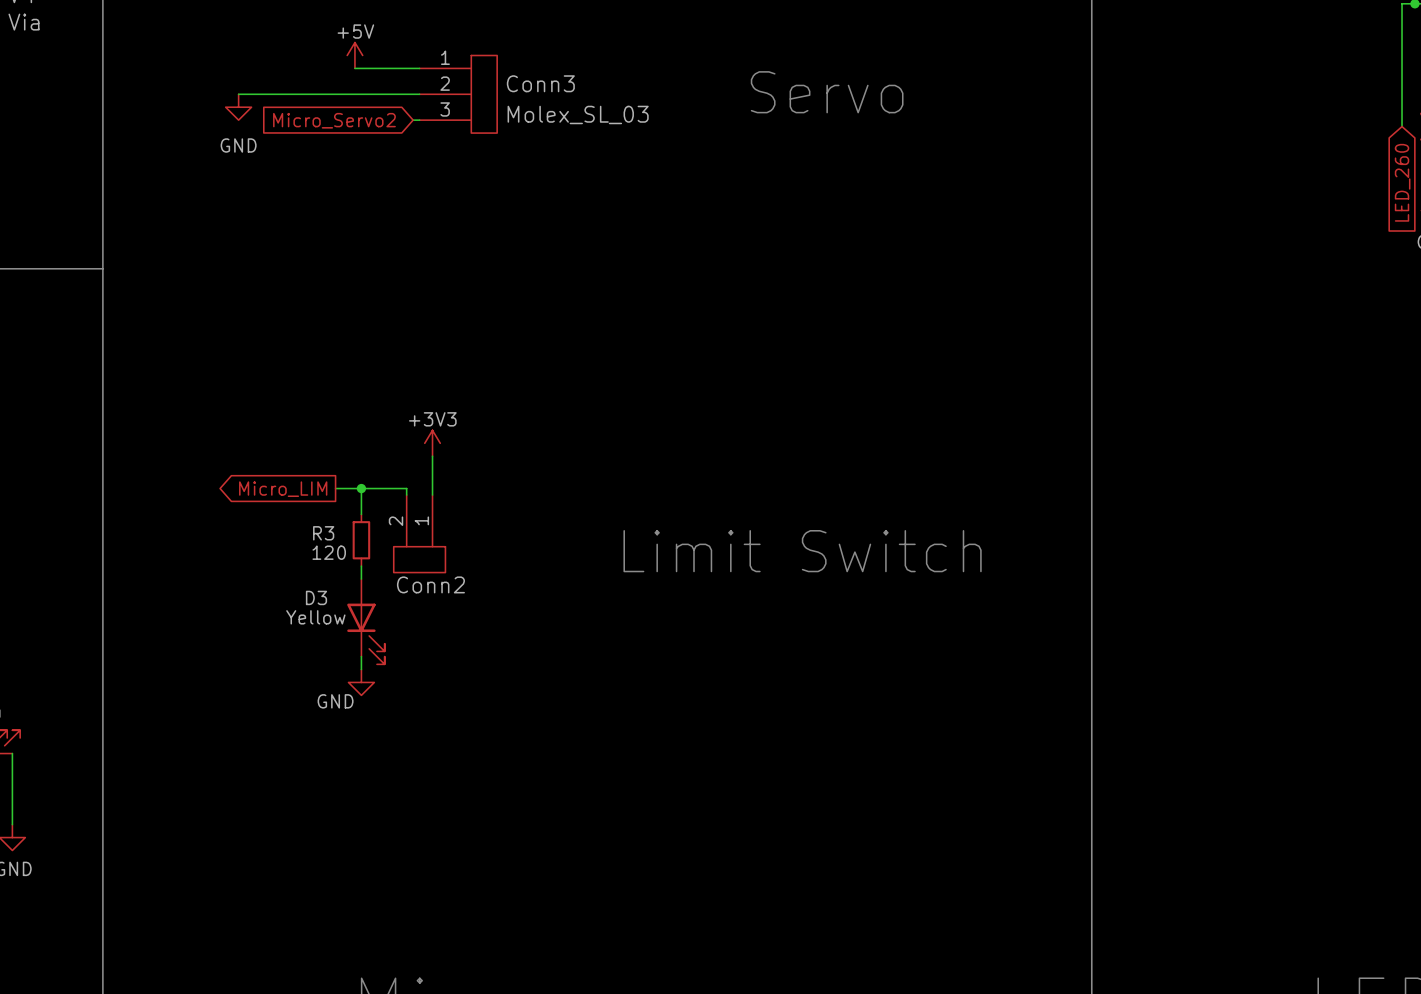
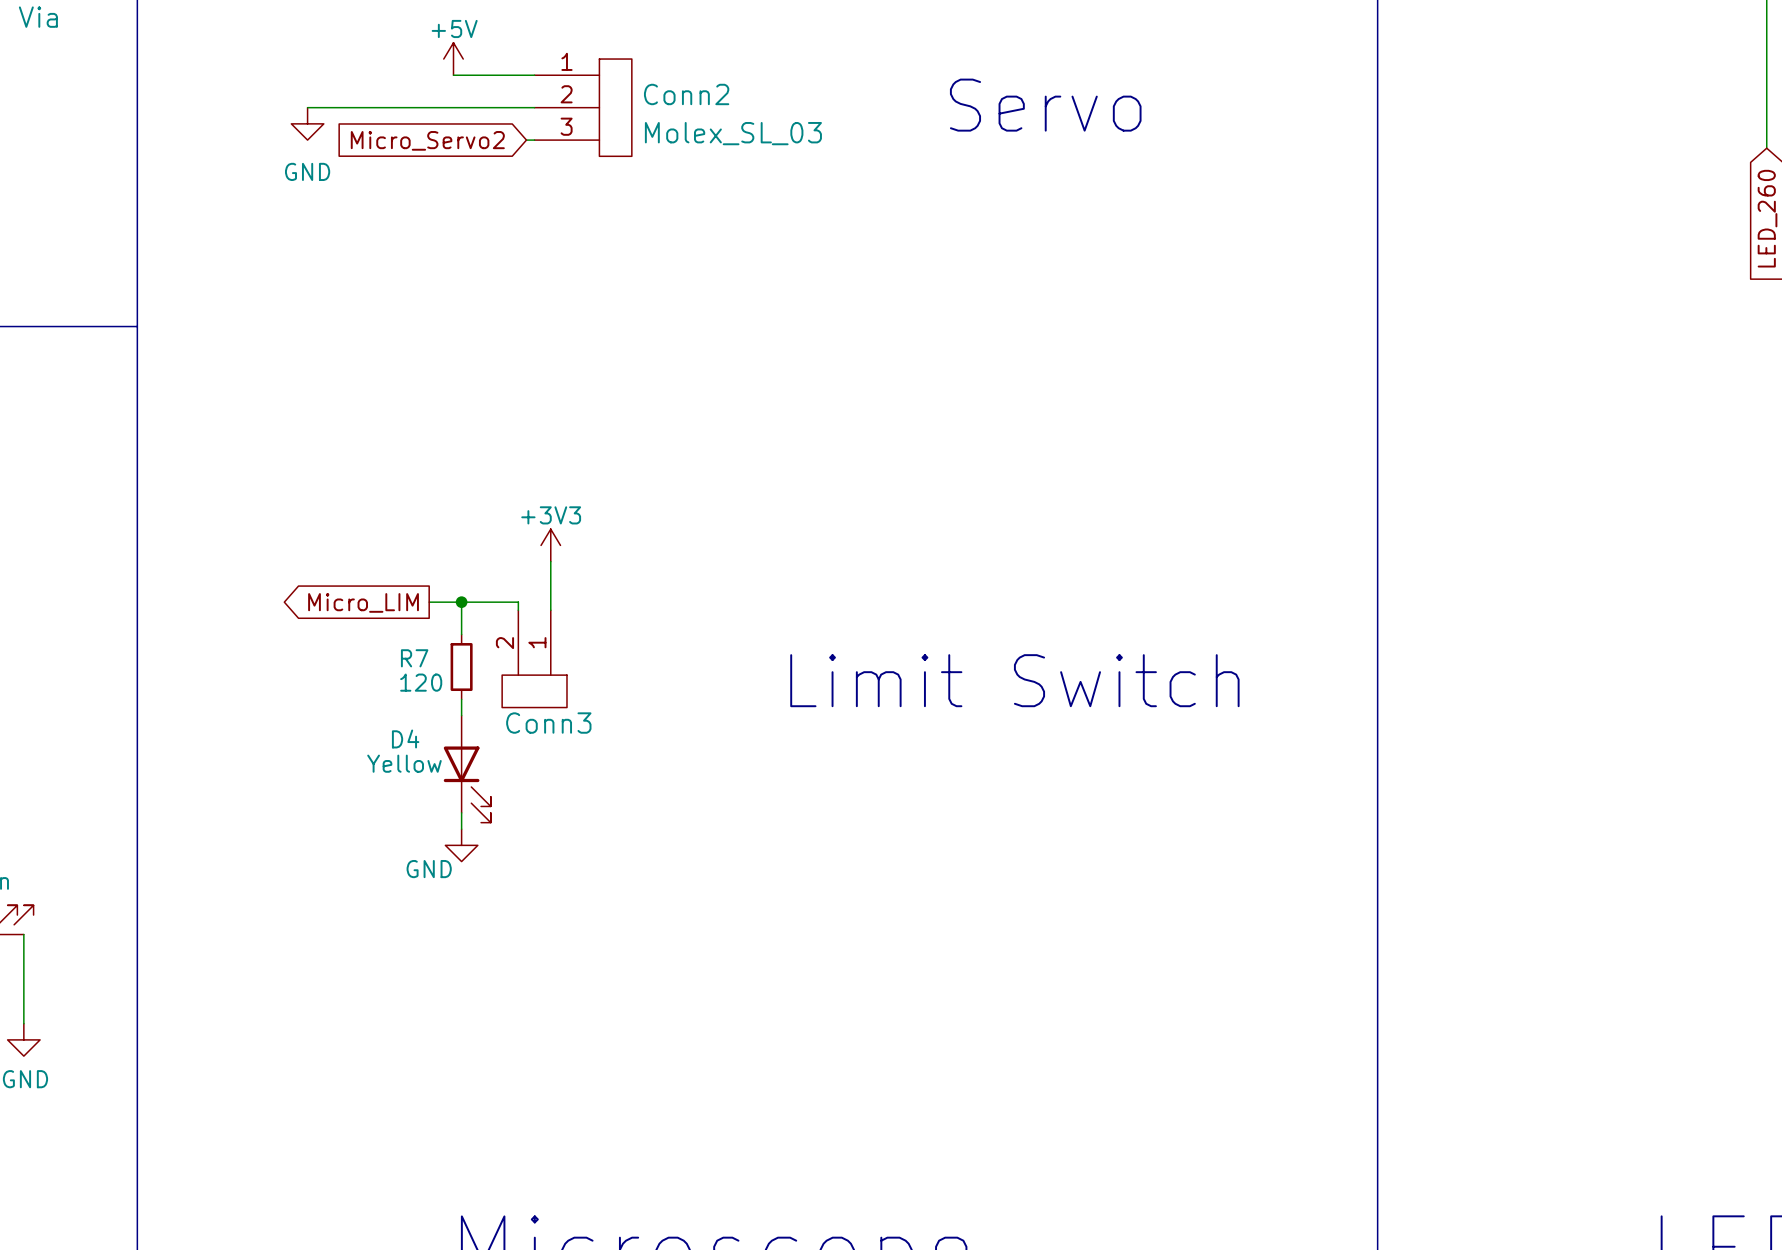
Conn3 name: Conn3 (540, 83) -> Conn2 (686, 94)
R3 name: R3 (323, 533) -> R7 (414, 658)
Conn2 name: Conn2 (430, 584) -> Conn3 (548, 723)
D3 name: D3 (316, 597) -> D4 (405, 738)

